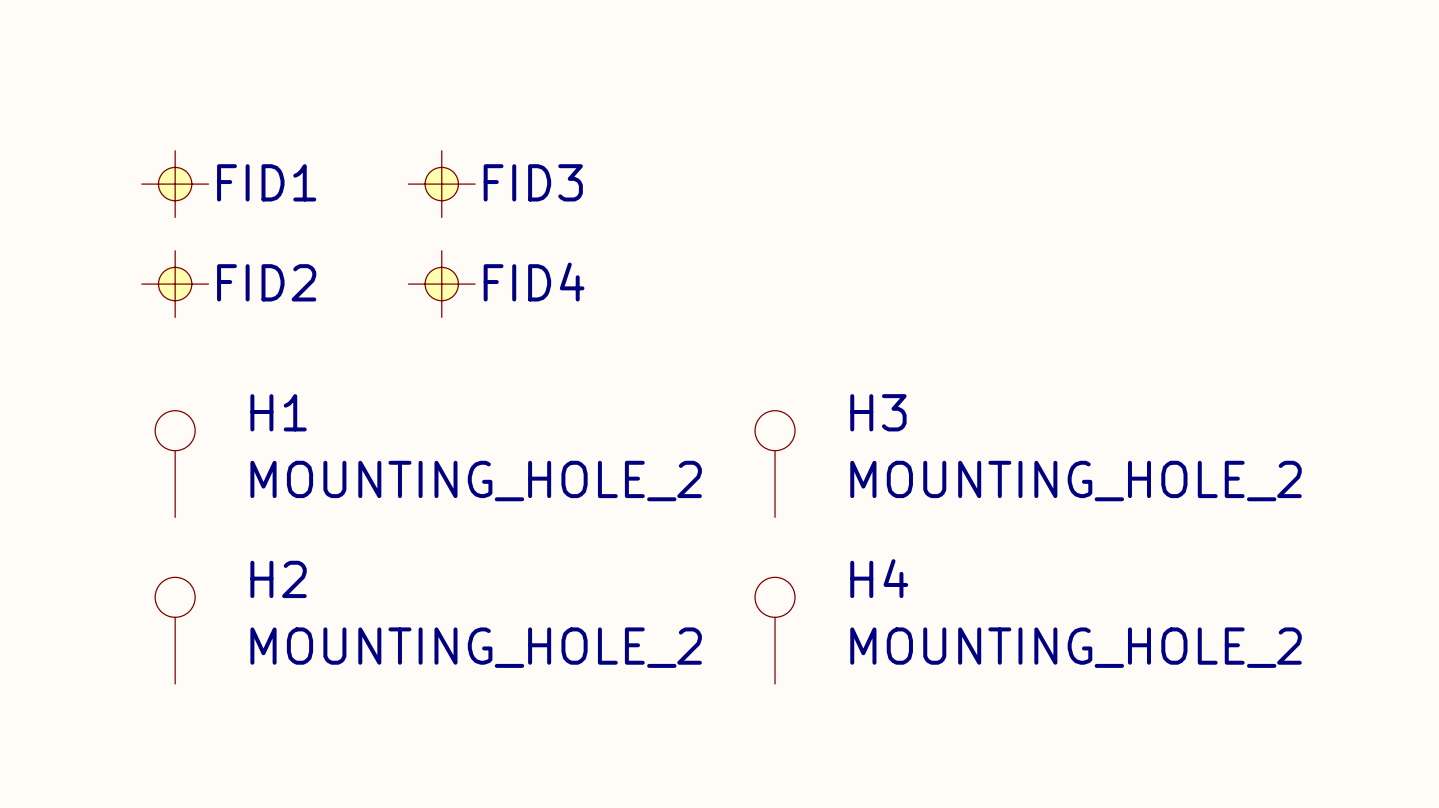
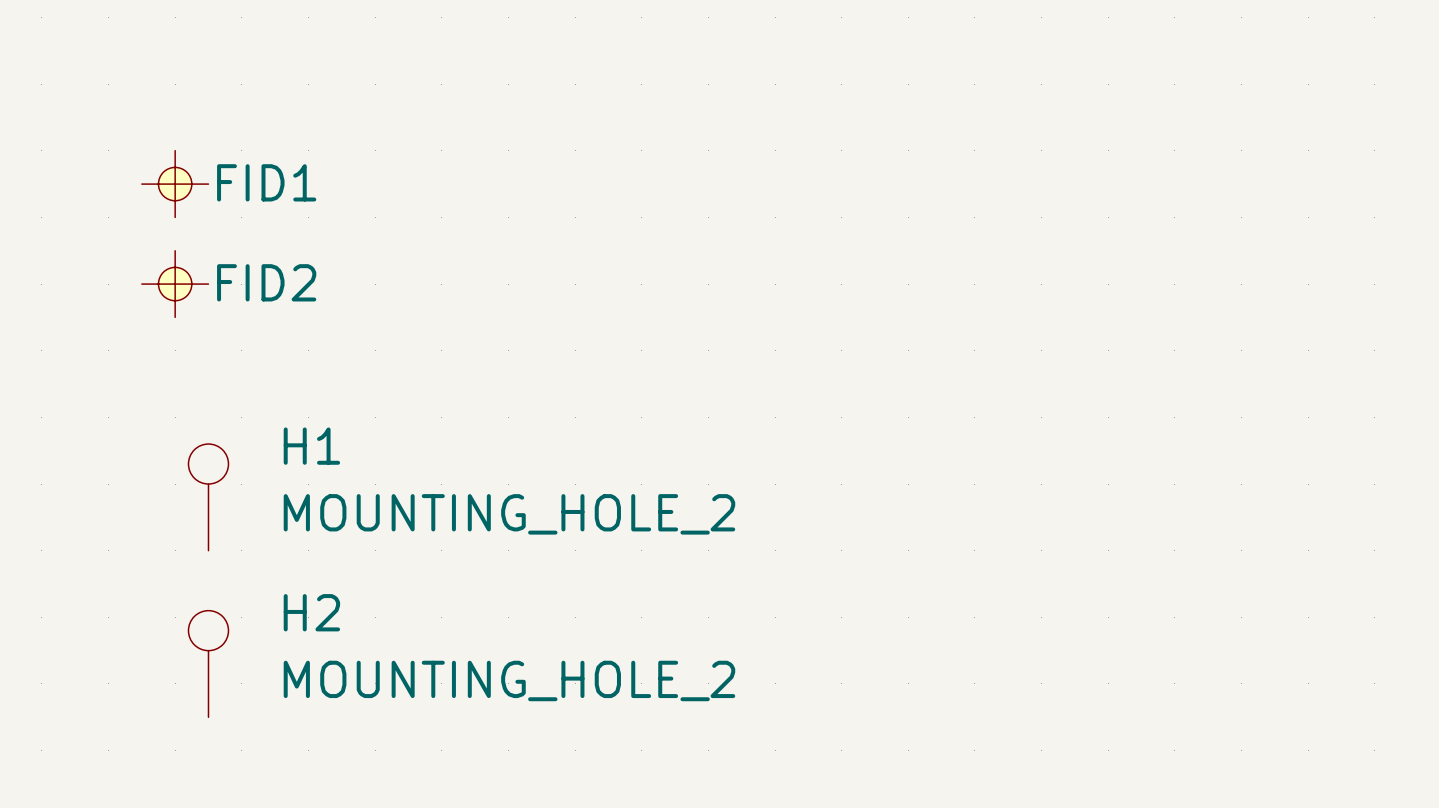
FID3: (441, 184) -> none
FID4: (441, 284) -> none
H1 position: (175, 464) -> (208, 497)
H3: MOUNTING_HOLE_2 (775, 464) -> none
H2 position: (175, 630) -> (208, 663)
H4: MOUNTING_HOLE_2 (775, 630) -> none

